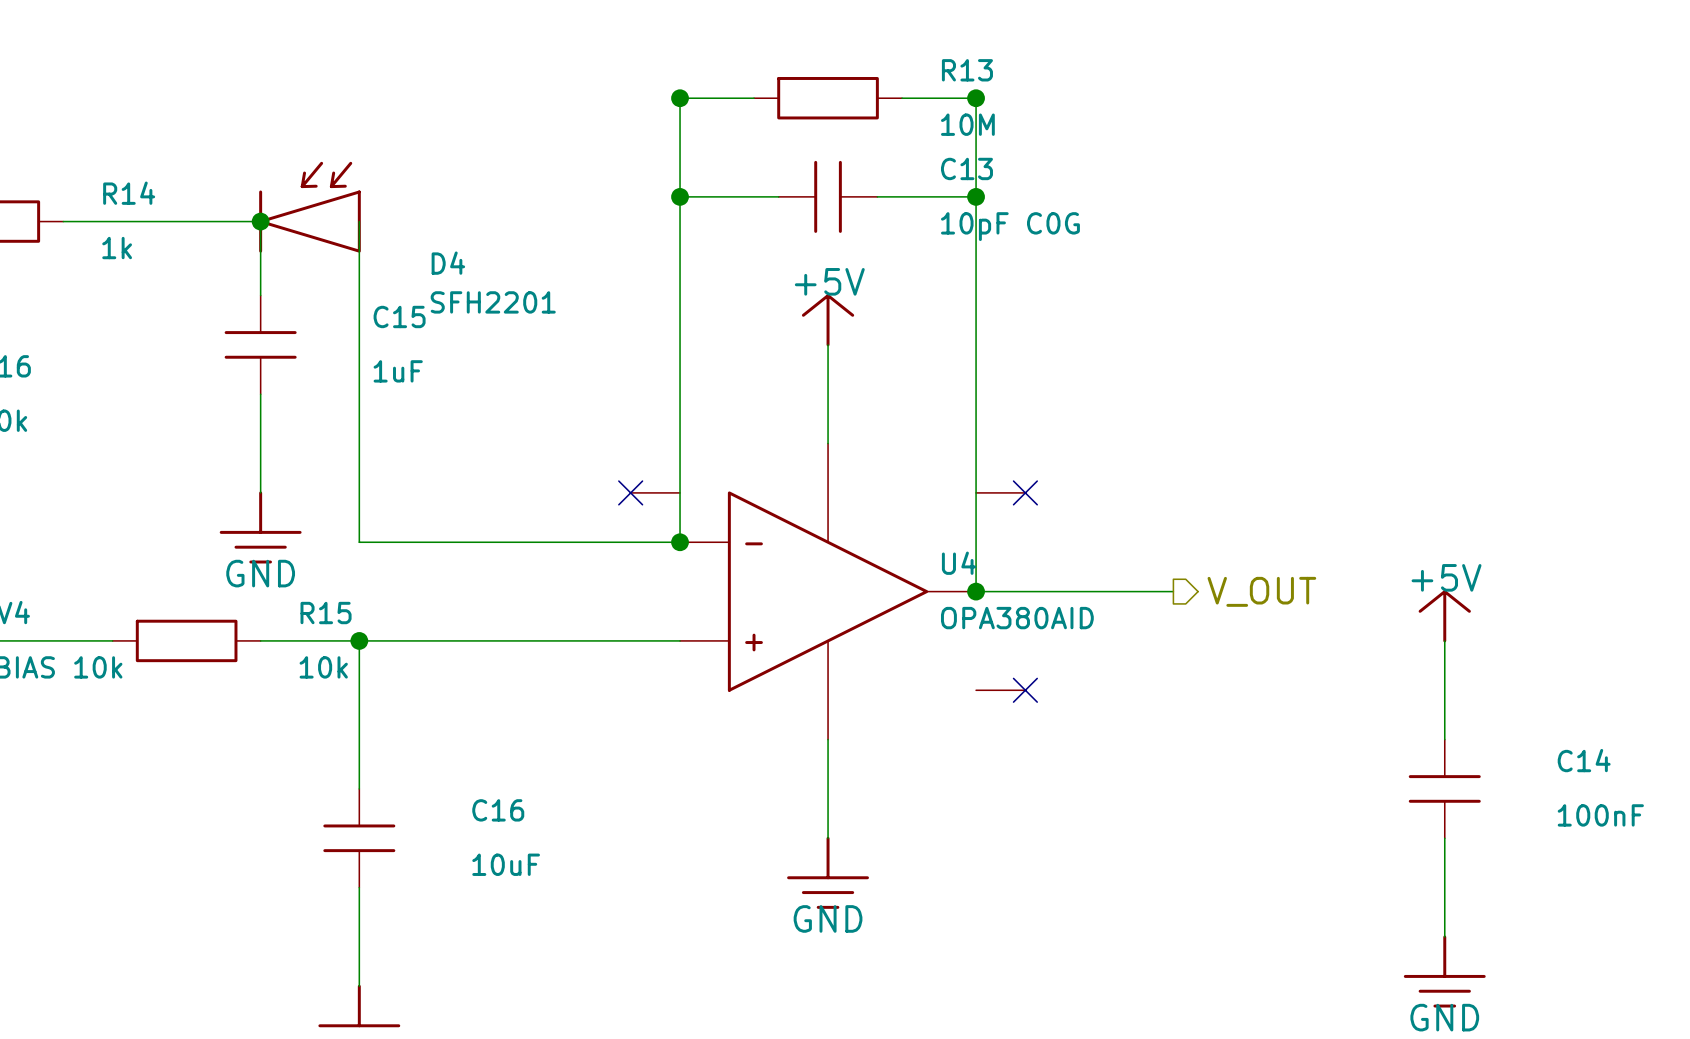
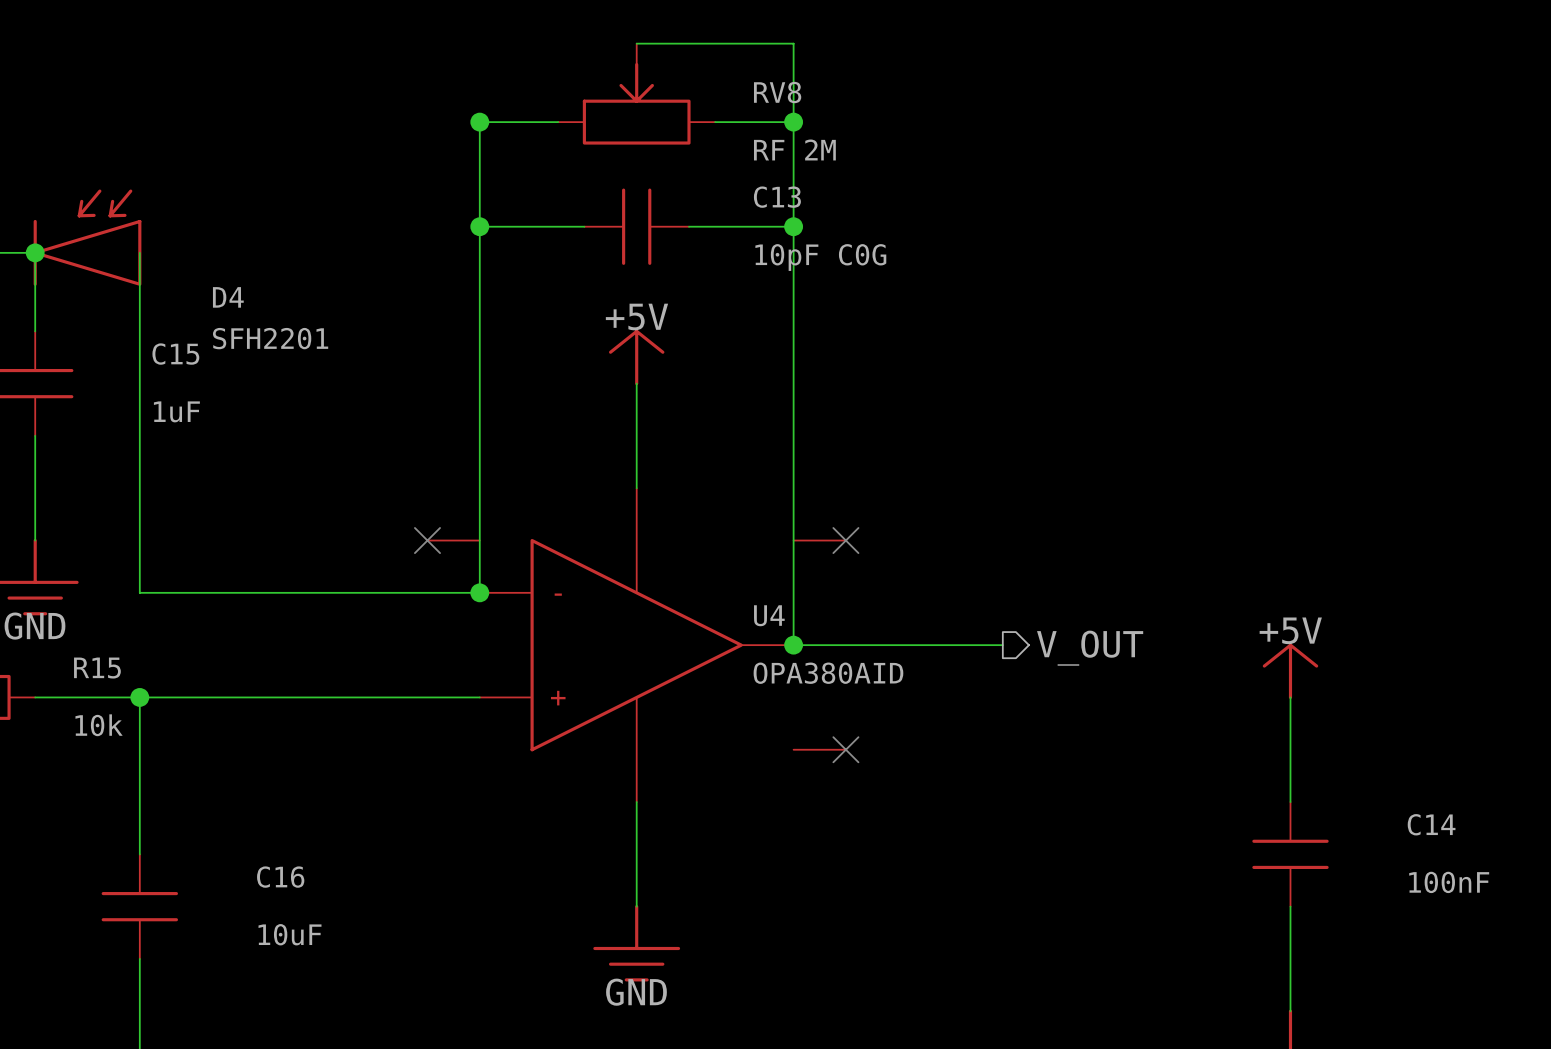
wire: none -> (636, 43) (793, 43) (793, 122)
RV8: none -> RF 2M (636, 94)
R13: 10M (828, 98) -> none

